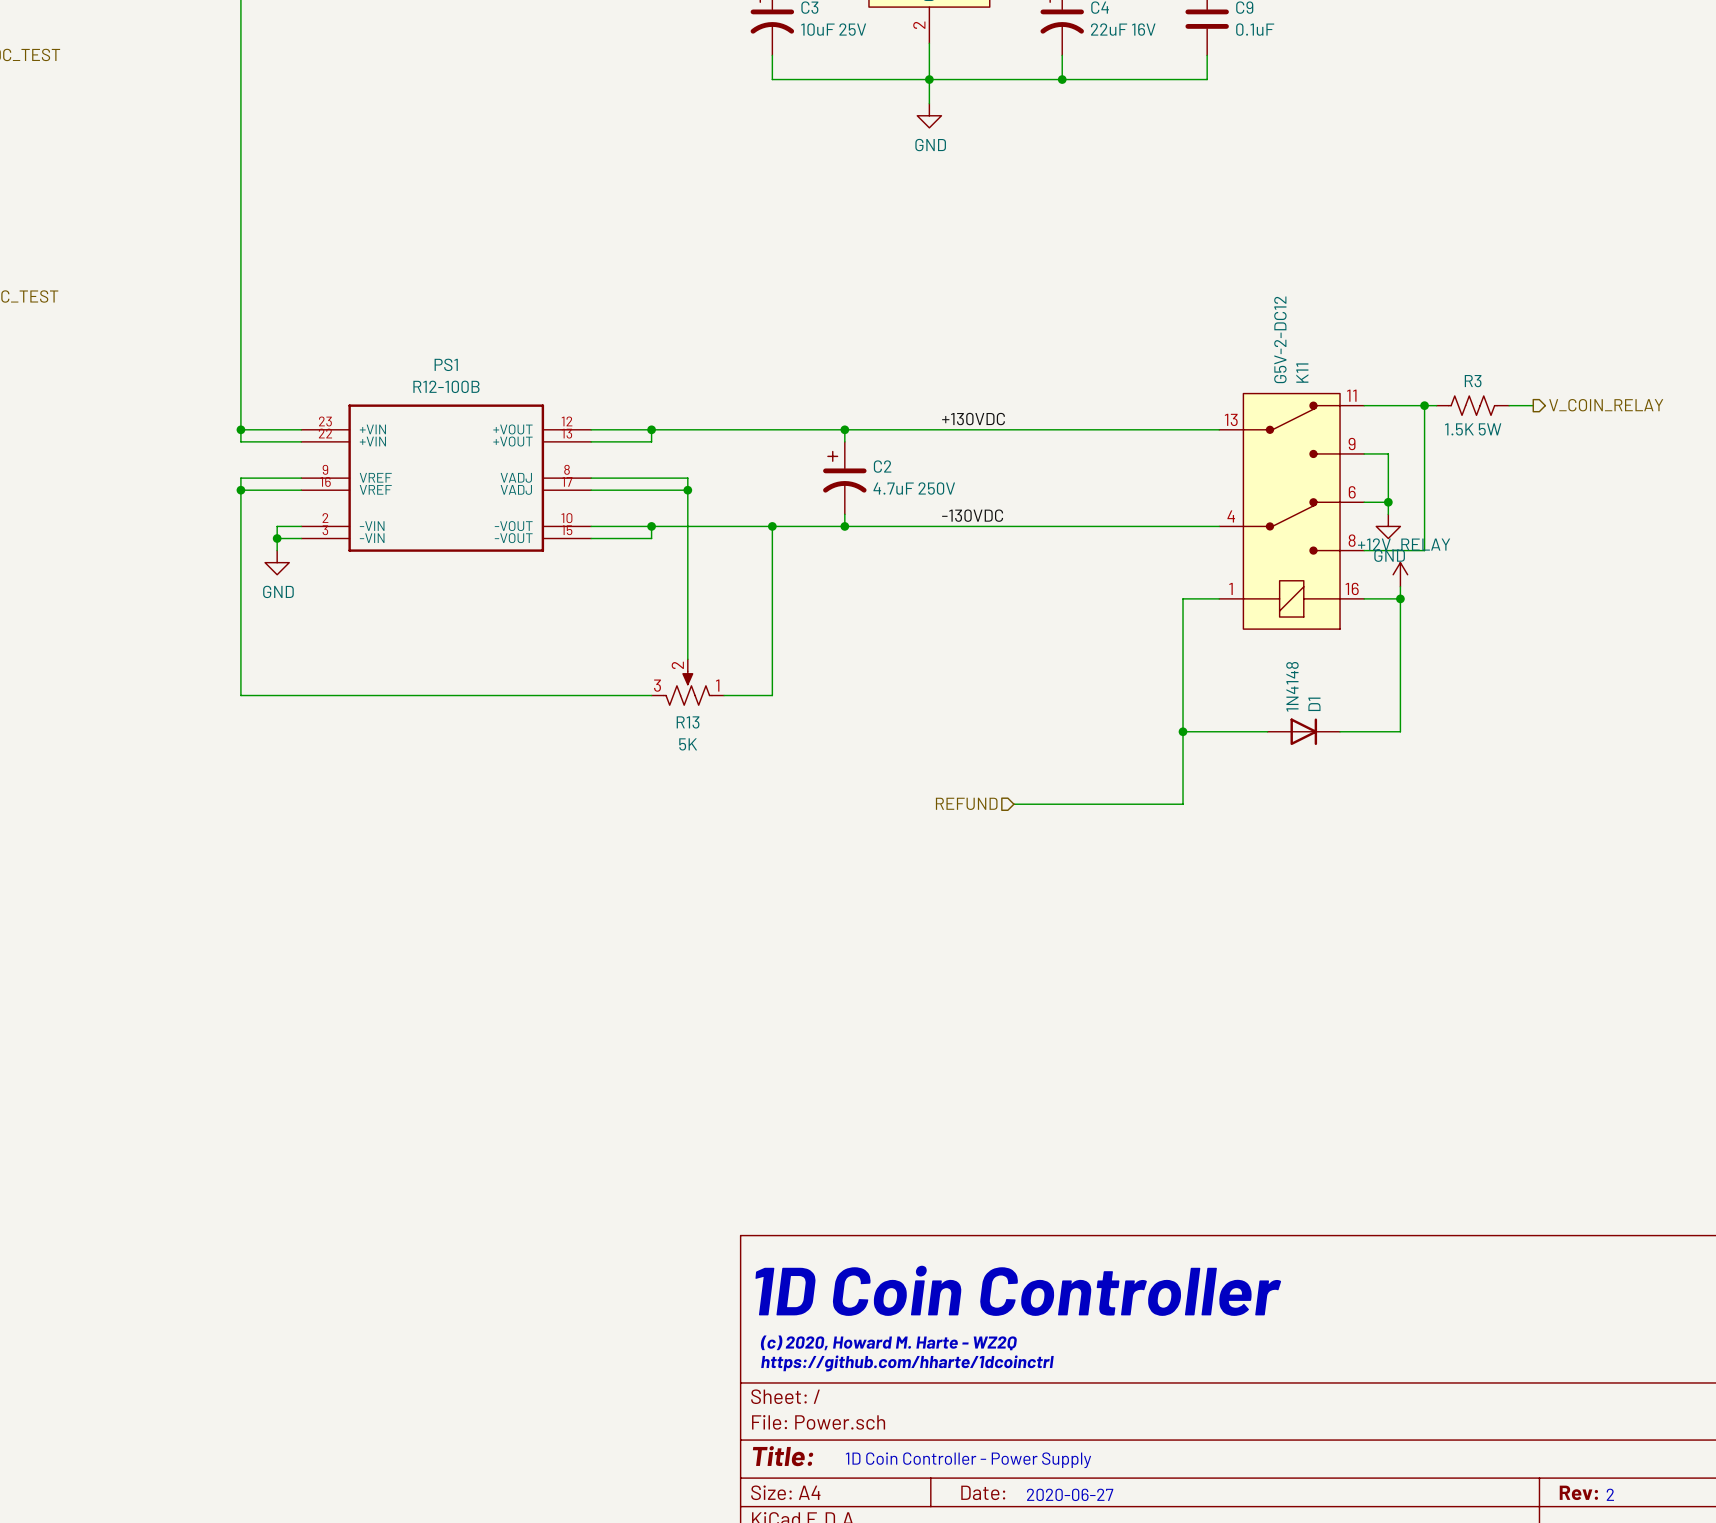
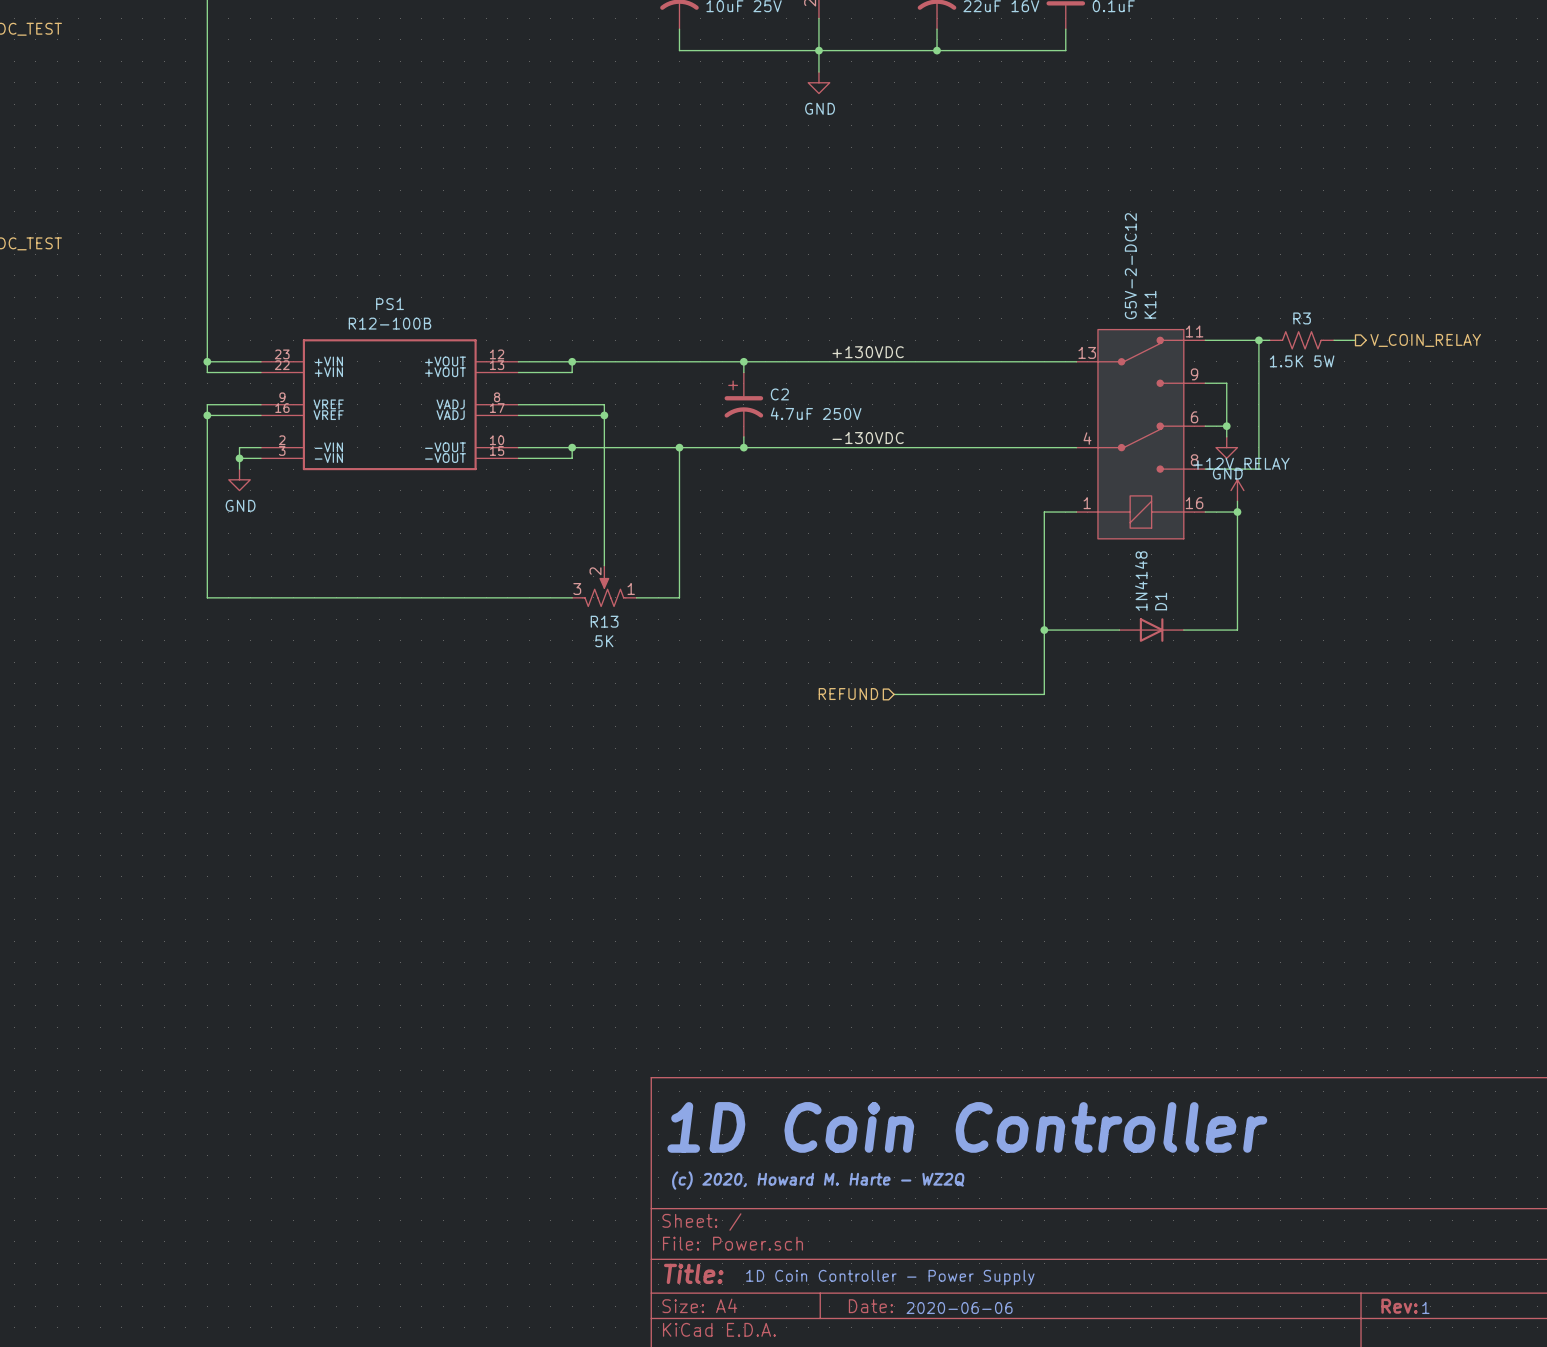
text position: (c) 2020, Howard M. Harte - WZ2Q (888, 1342) -> (c) 2020, Howard M. Harte - WZ2Q (818, 1180)
text: https://github.com/hharte/1dcoinctrl (907, 1363) -> none
text: 2020-06-27 (1070, 1494) -> 2020-06-06 (959, 1308)
text: 2 (1610, 1494) -> 1 (1425, 1308)

